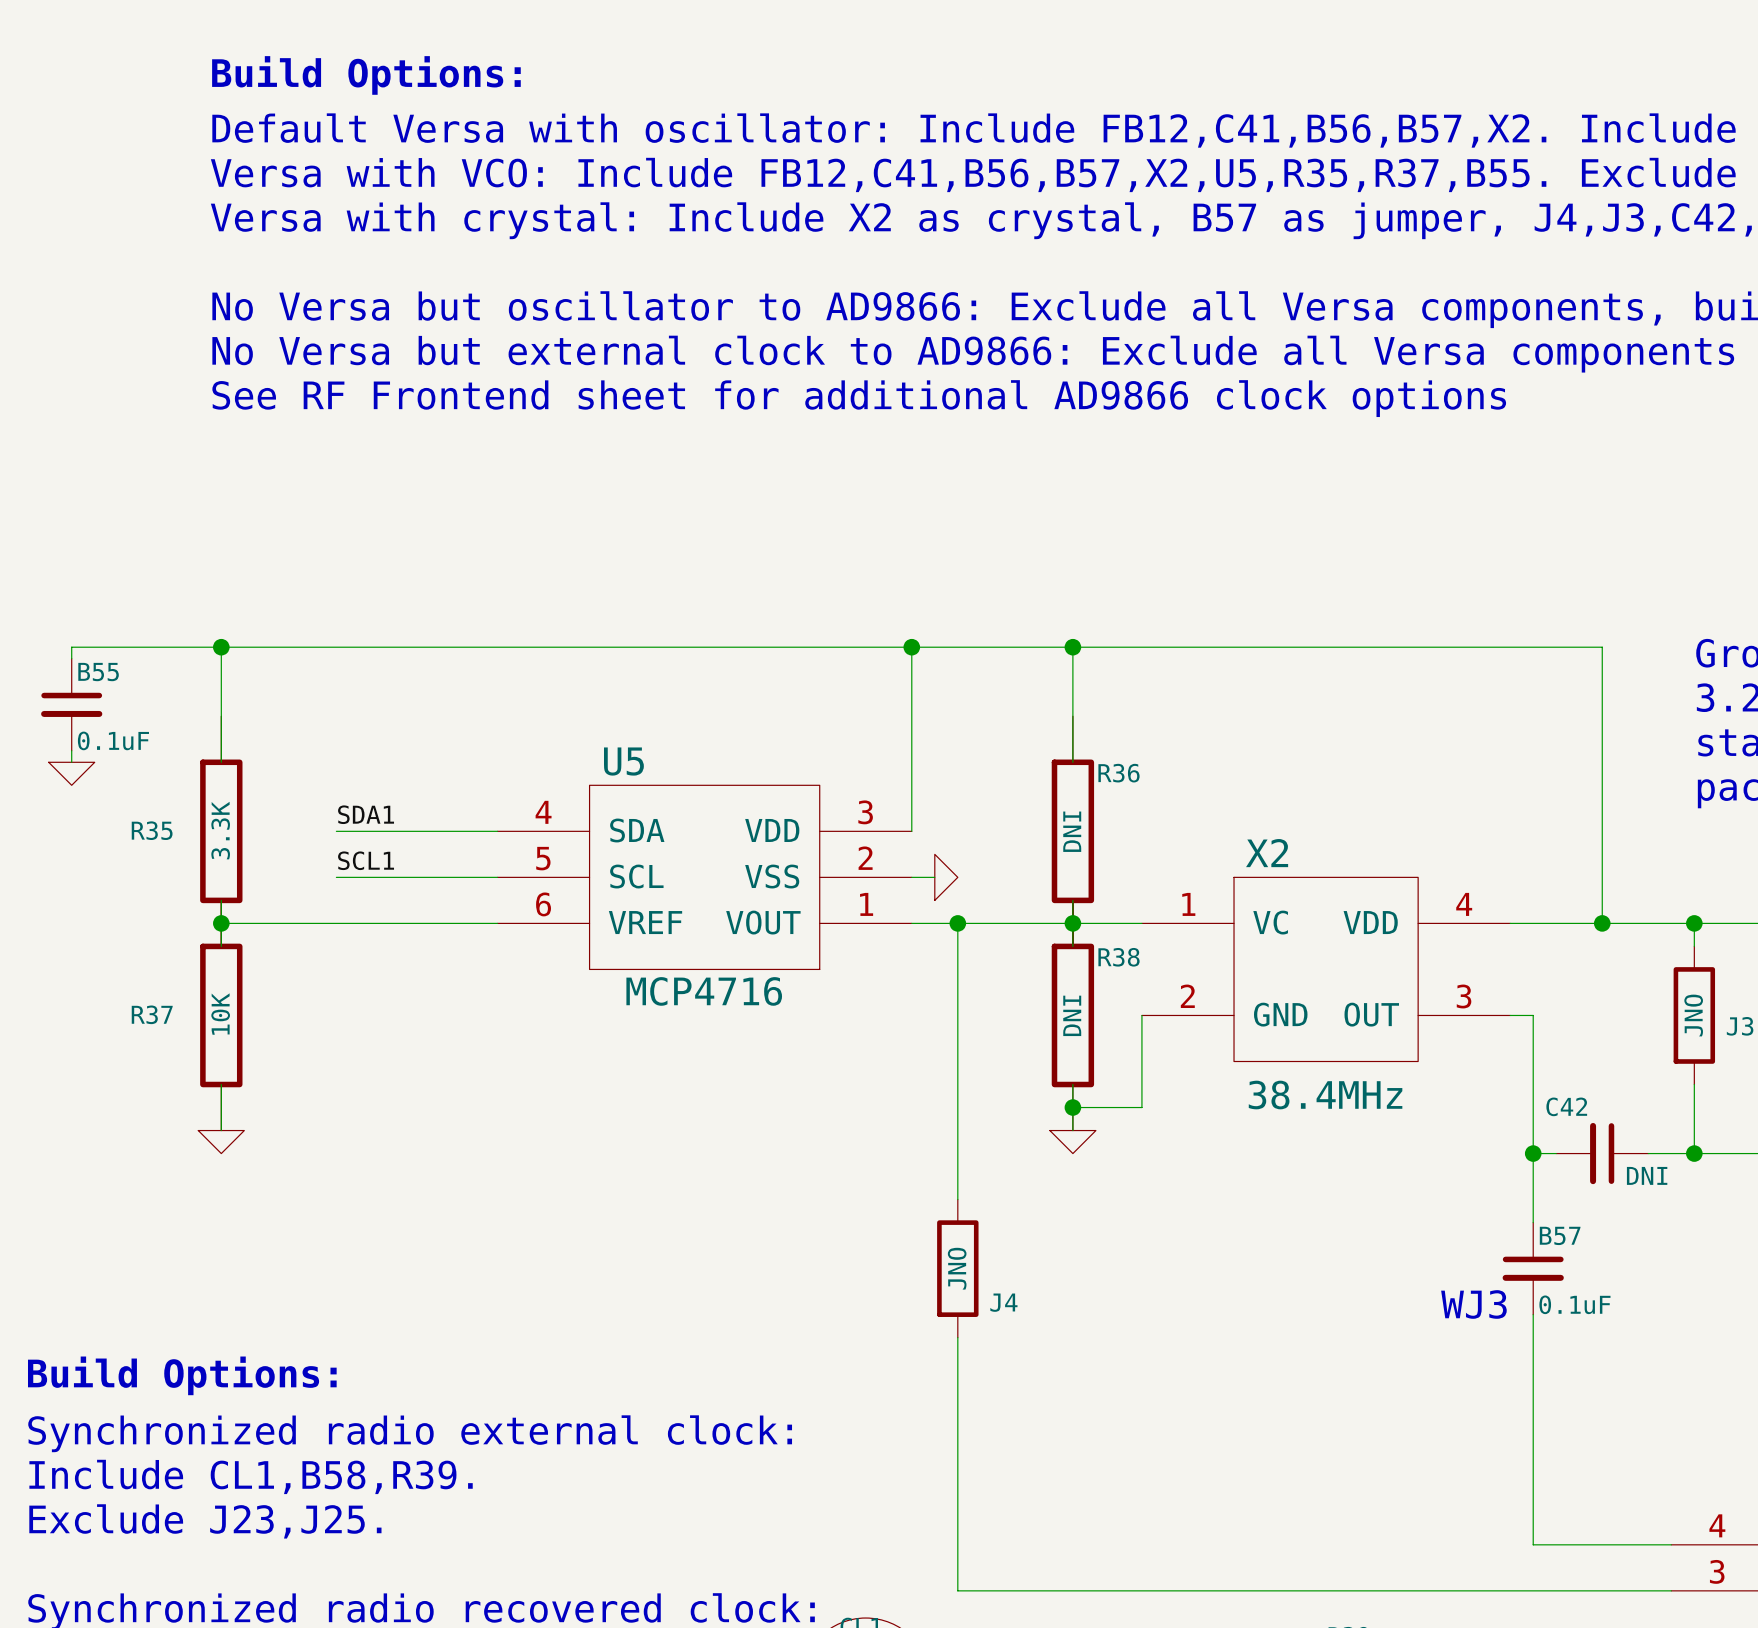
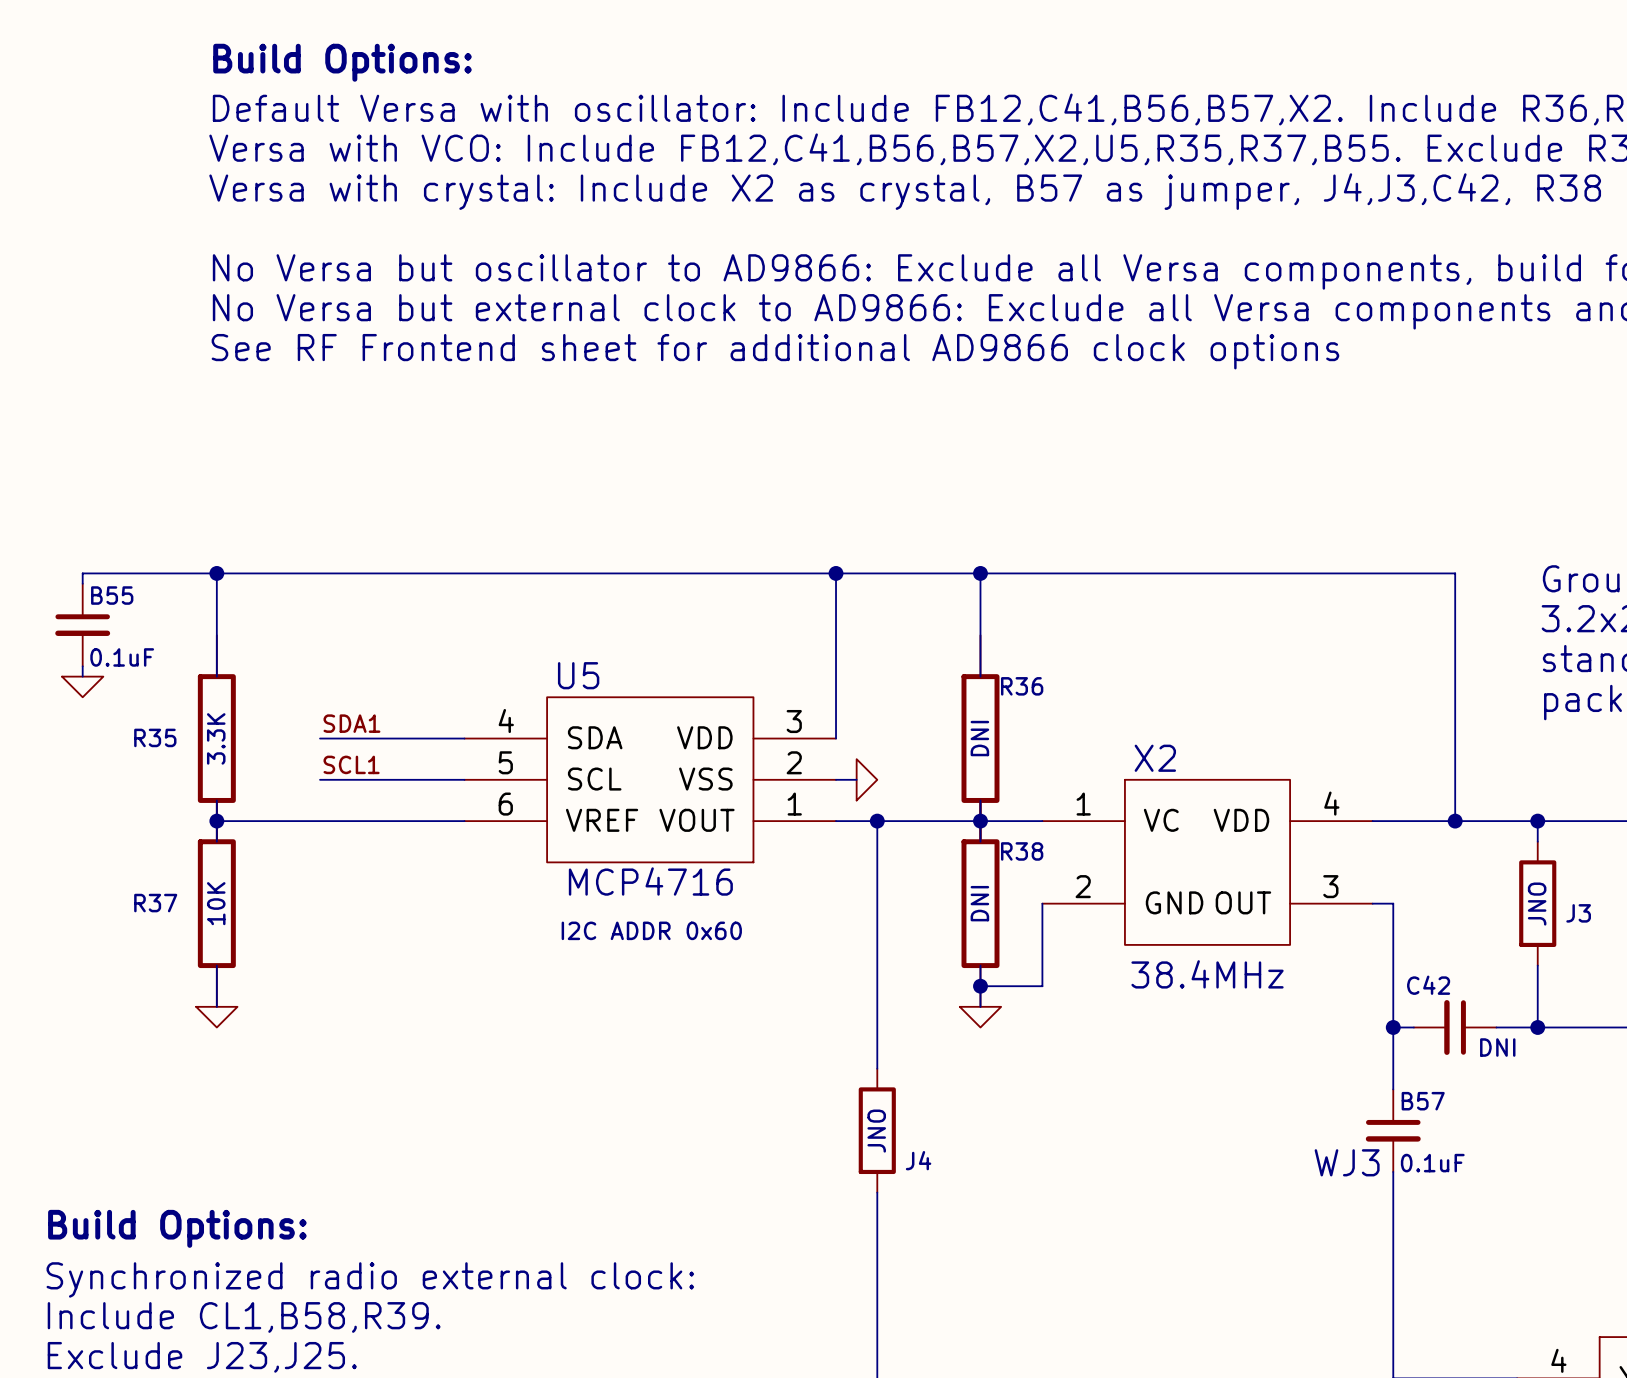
text: none -> I2C ADDR 0x60 (651, 930)

